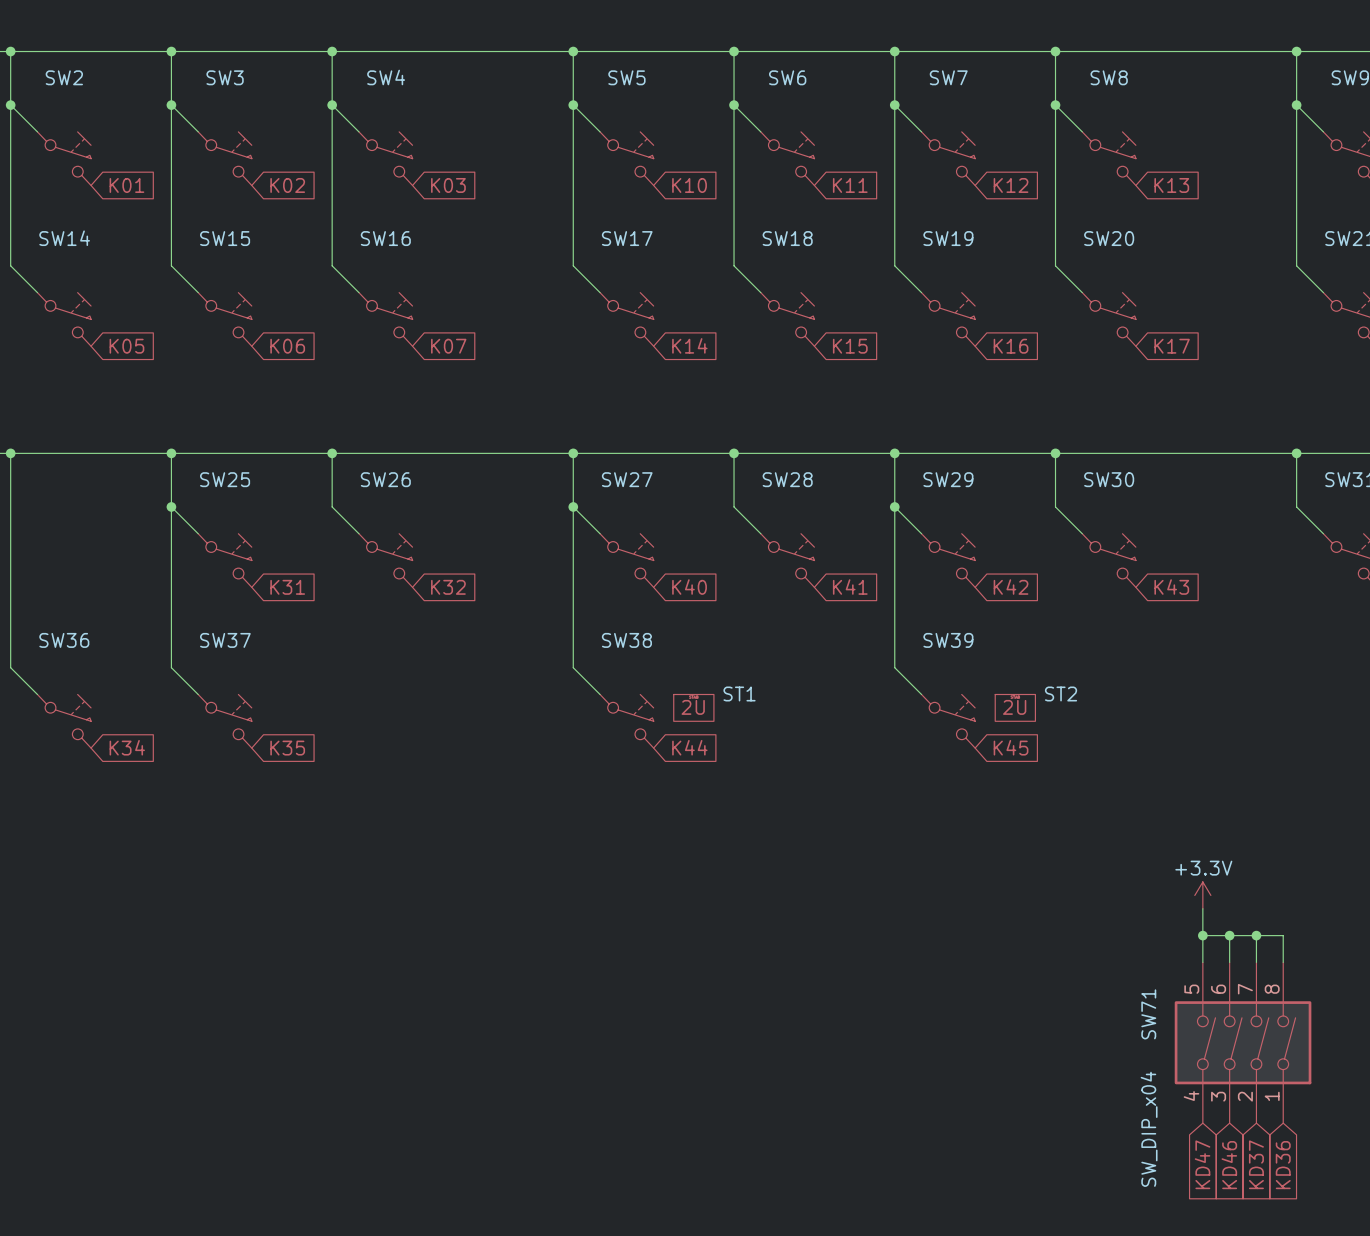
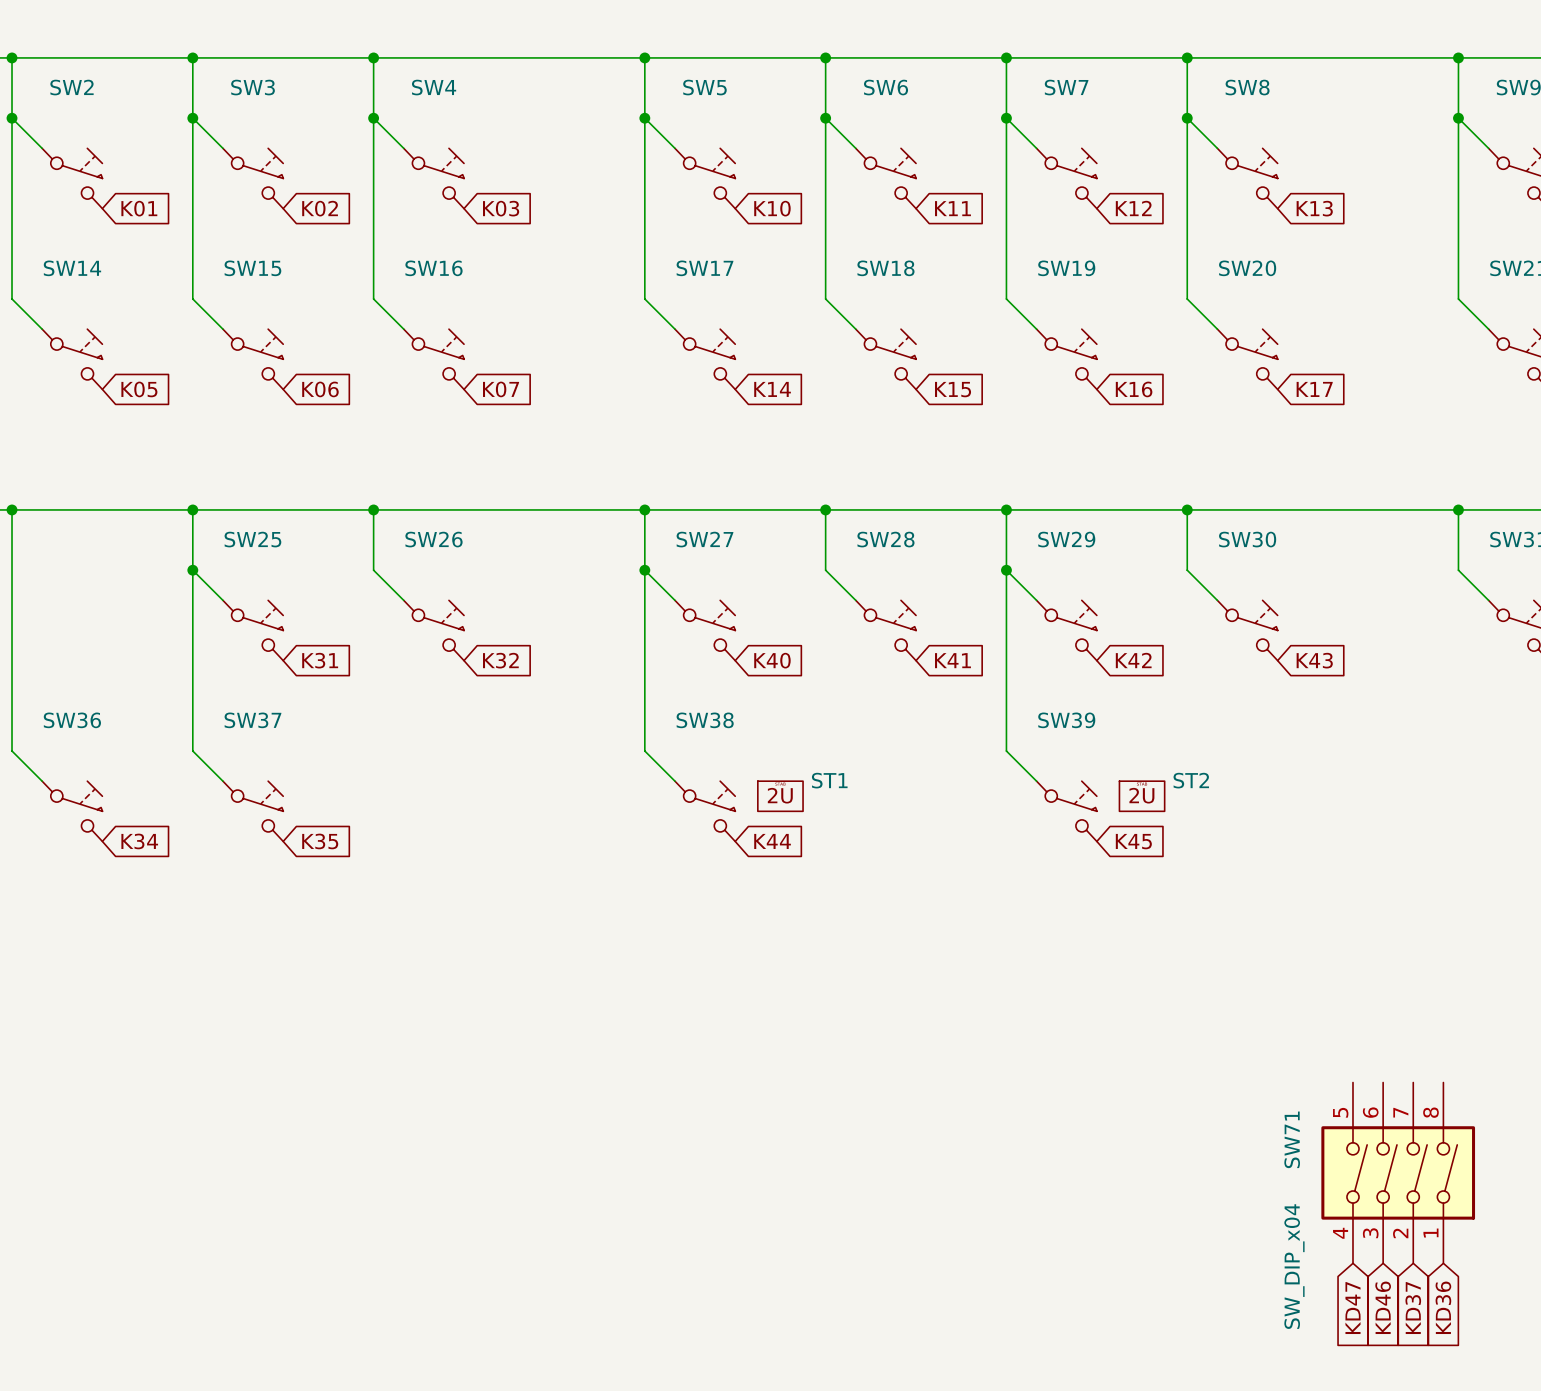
power symbol: +3.3V (1202, 895) -> none
wire: (1202, 908) (1202, 962) -> none
wire: (1202, 935) (1283, 935) (1283, 962) -> none
junction: (1202, 935) -> none
wire: (1229, 935) (1229, 962) -> none
junction: (1229, 935) -> none
wire: (1256, 935) (1256, 962) -> none
junction: (1256, 935) -> none

